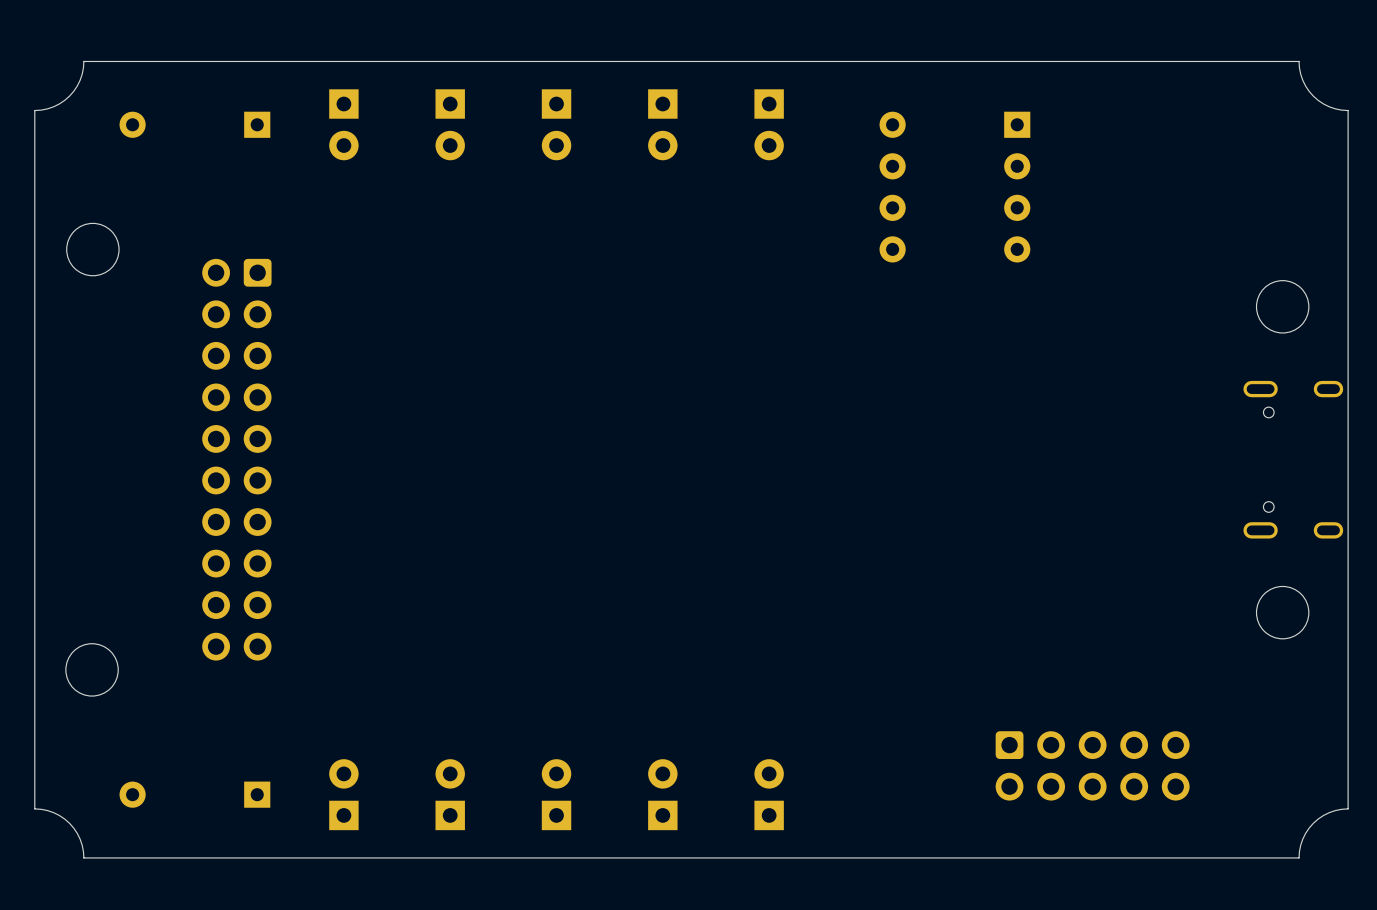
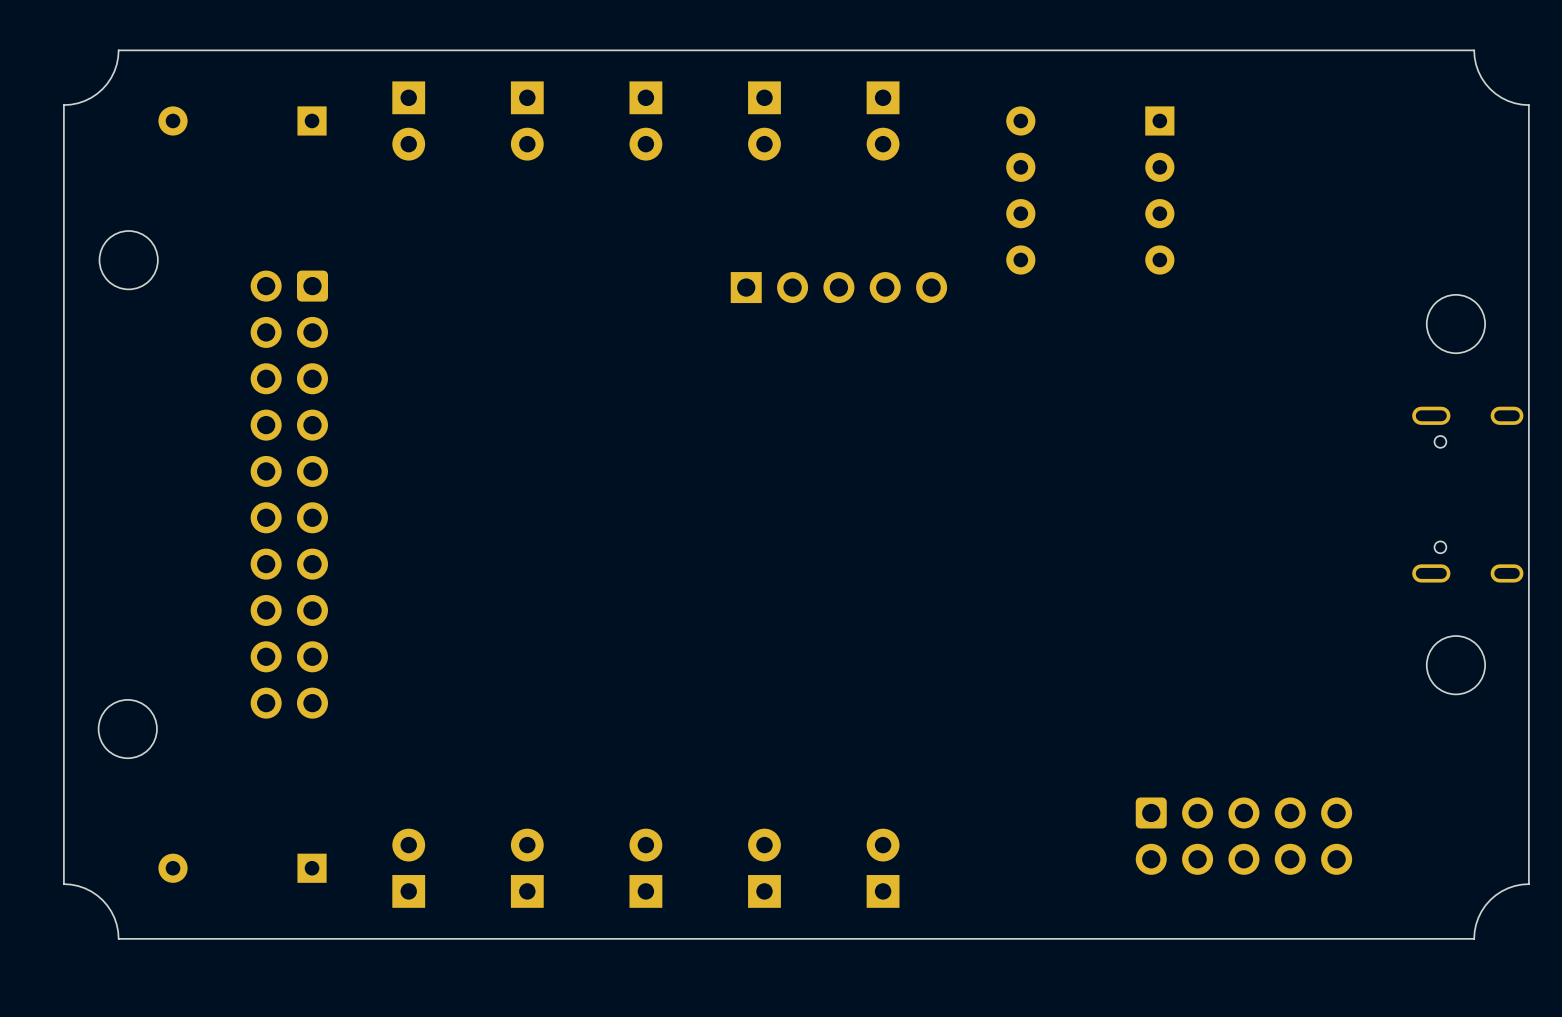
part: none -> (838, 287)

